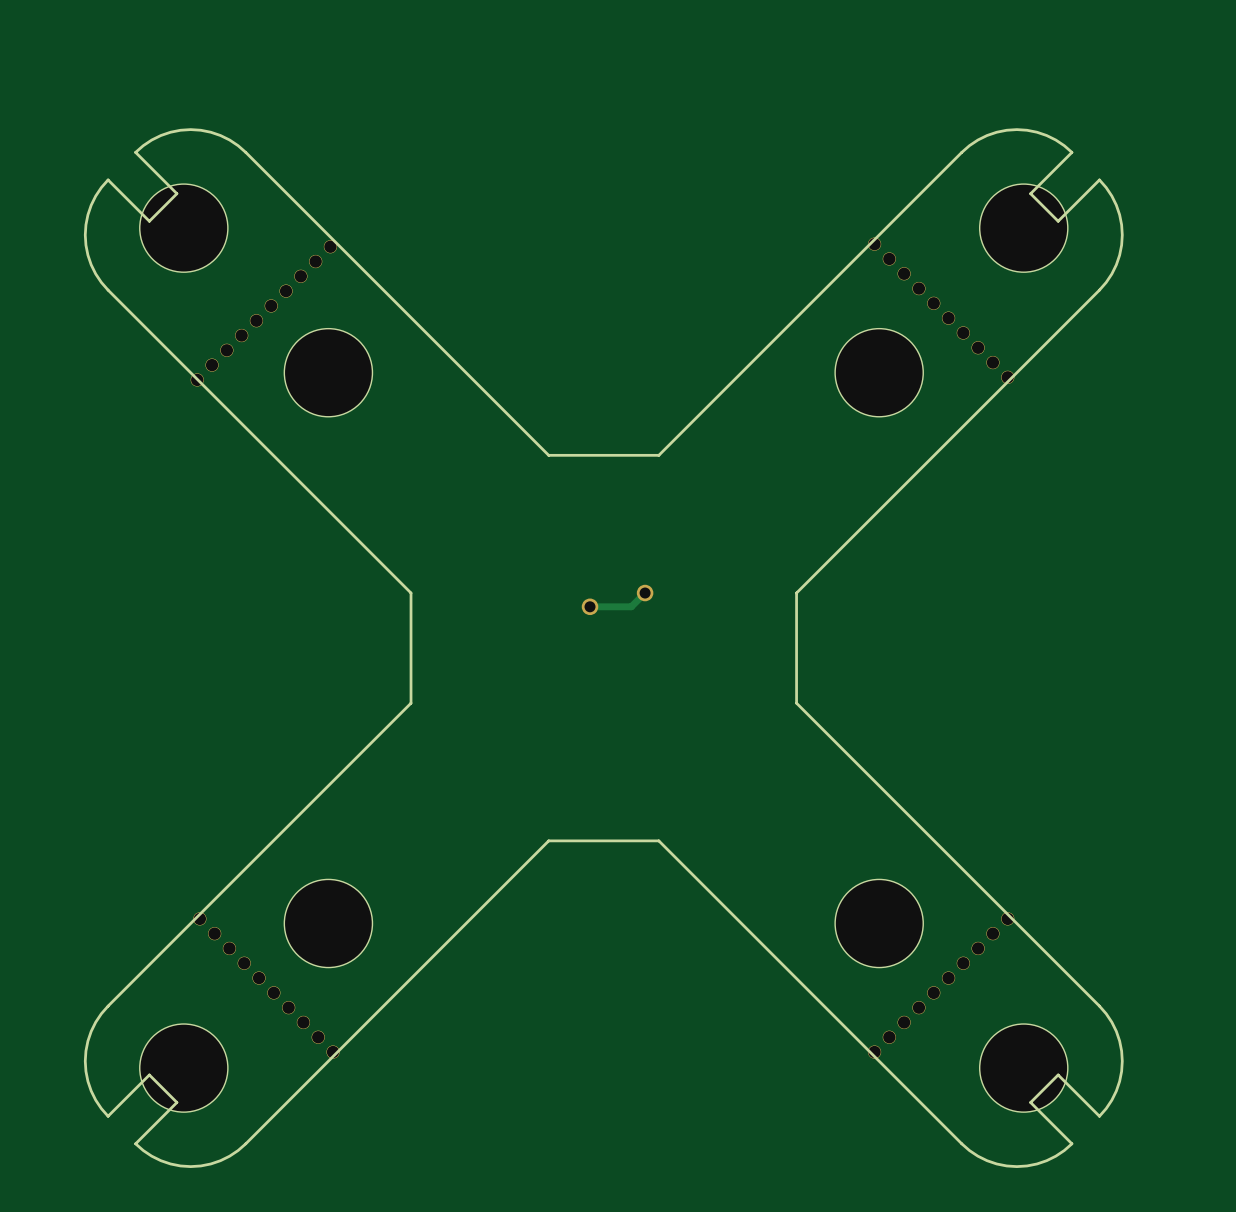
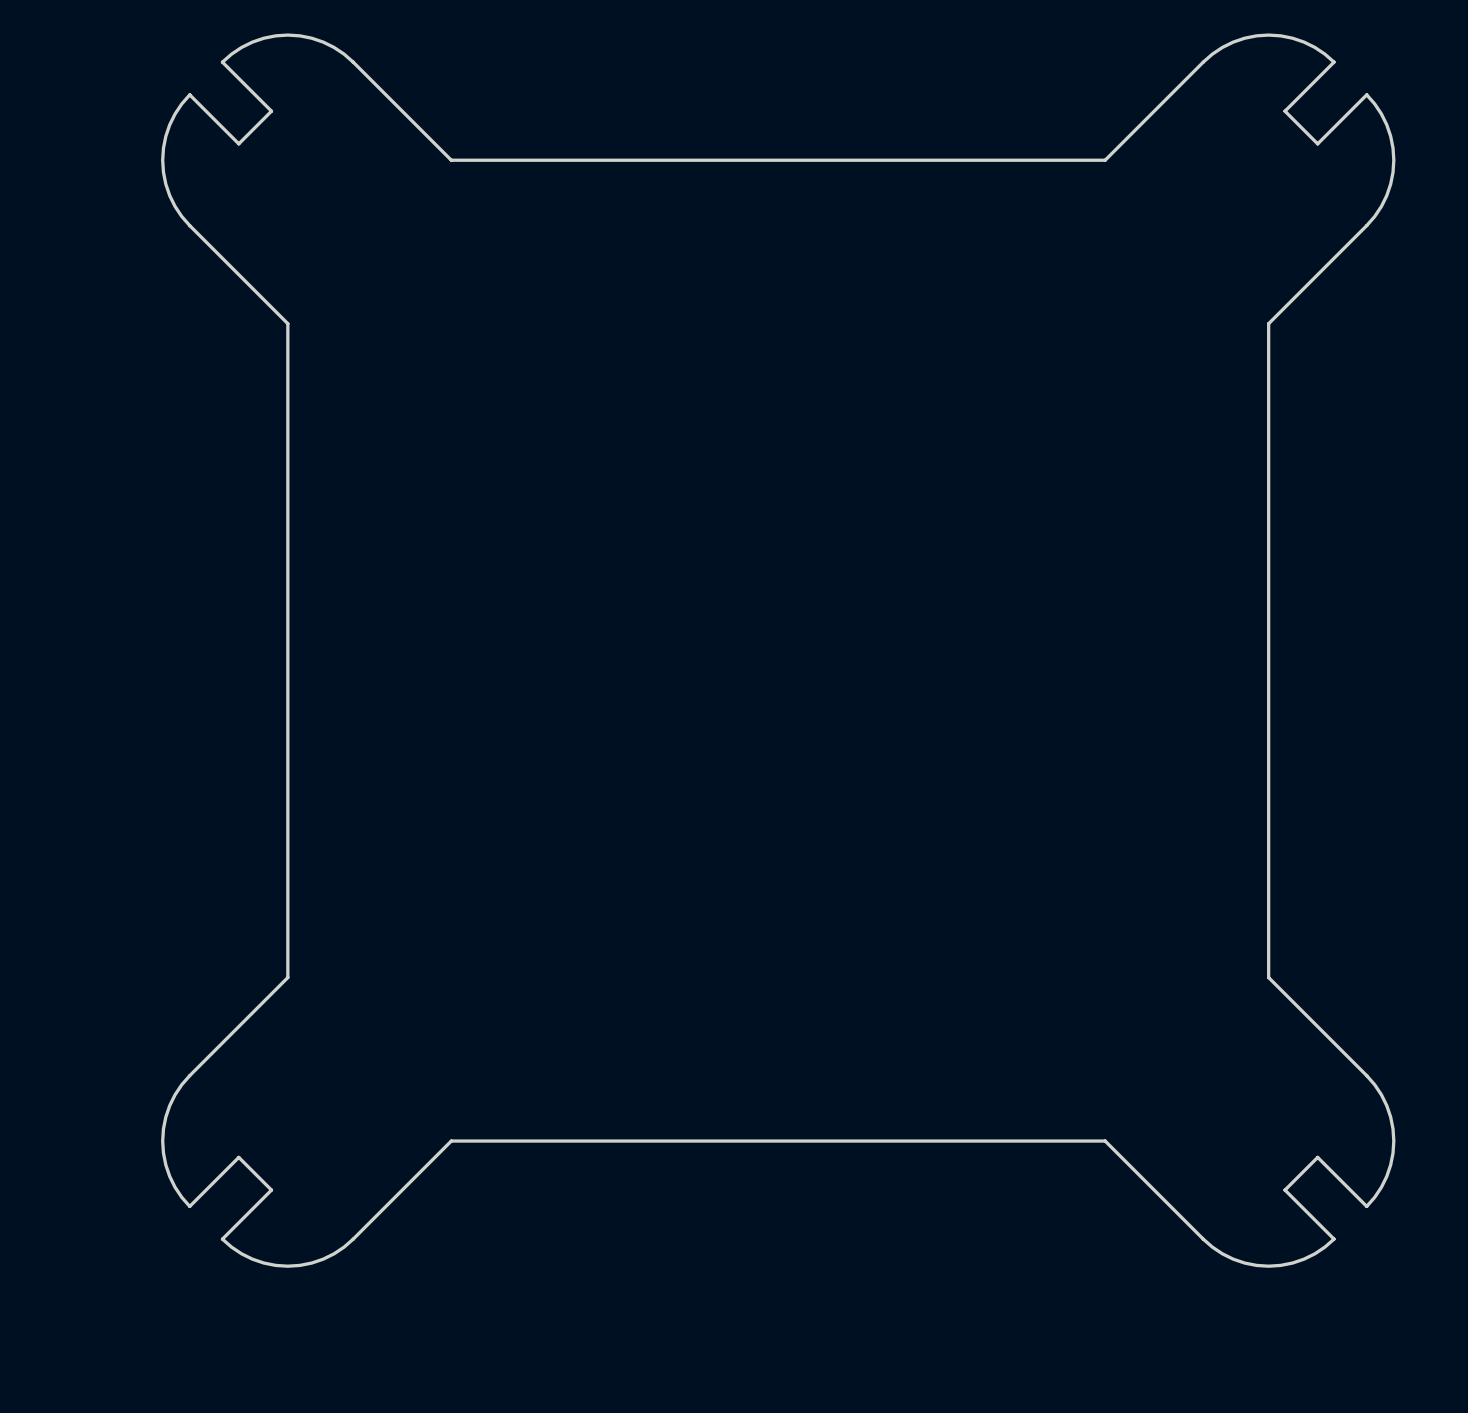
part: (183, 228) -> none
part: (1023, 228) -> none
board edge: (879, 235) (658, 455) (548, 455) (328, 235) -> (1105, 160) (451, 160)
part: (941, 310) -> none
part: (263, 313) -> none
board edge: (190, 372) (411, 593) (411, 703) (190, 923) -> (287, 323) (287, 977)
part: (328, 372) -> none
part: (879, 372) -> none
board edge: (1016, 372) (796, 593) (796, 703) (1016, 923) -> (1268, 323) (1268, 977)
track: (645, 593) (631, 606) (590, 606) -> none
via: (645, 593) -> none
via: (590, 606) -> none
part: (328, 923) -> none
part: (879, 923) -> none
part: (266, 985) -> none
part: (941, 985) -> none
board edge: (879, 1061) (658, 840) (548, 840) (328, 1061) -> (1105, 1141) (451, 1141)
part: (183, 1068) -> none
part: (1023, 1068) -> none

